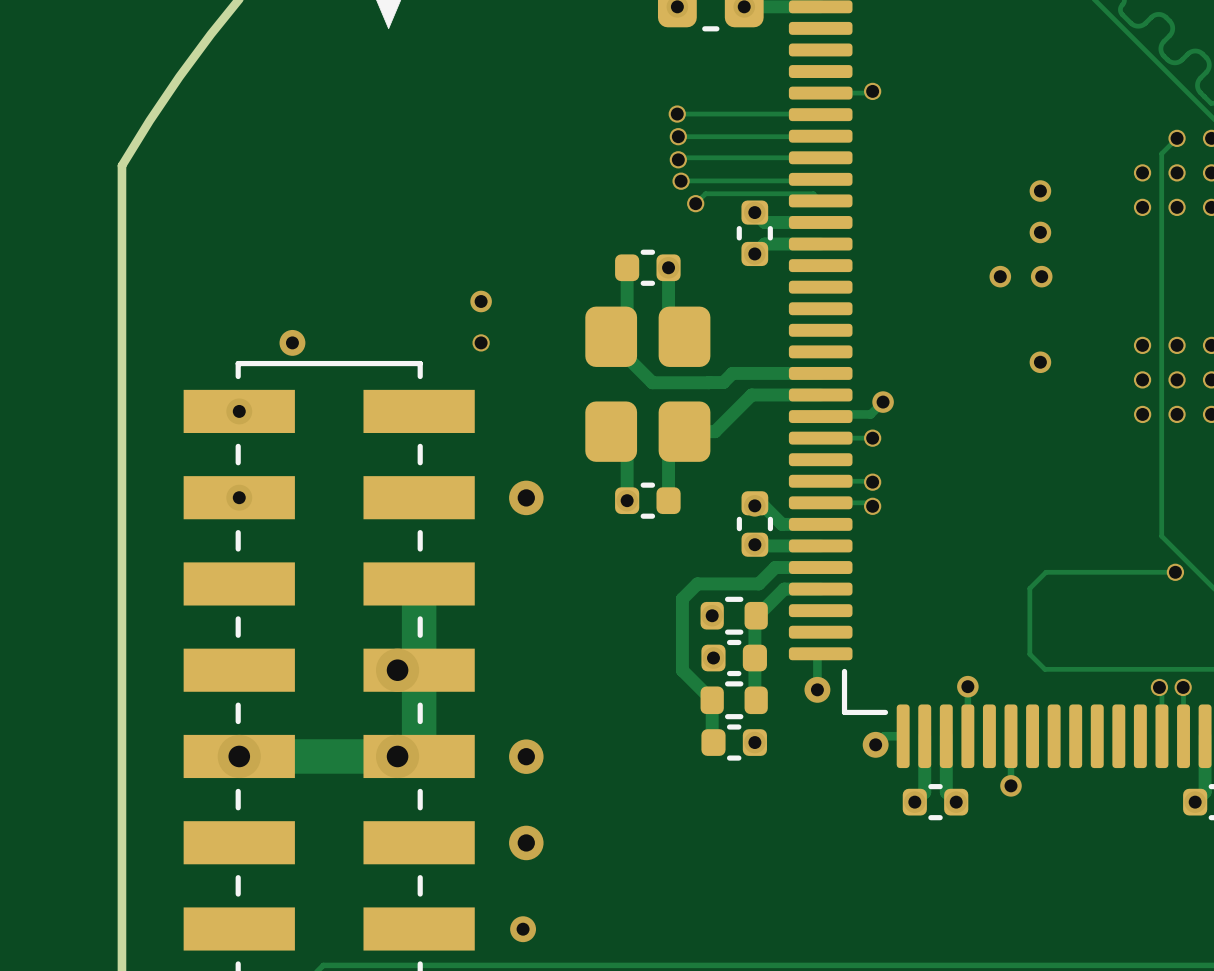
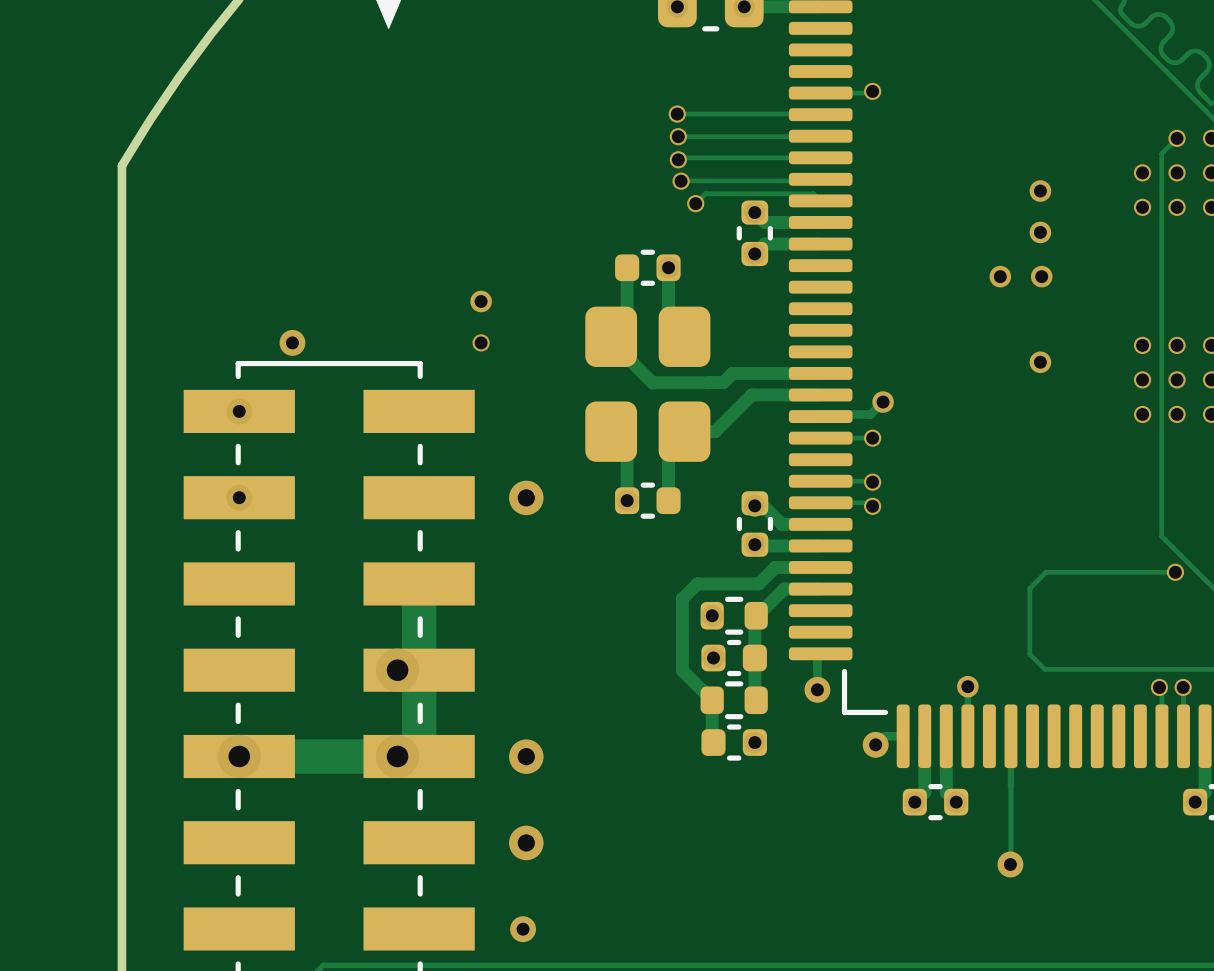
track: none -> (1011, 785) (1011, 863)
via: (1011, 785) -> none
via: none -> (1010, 864)

